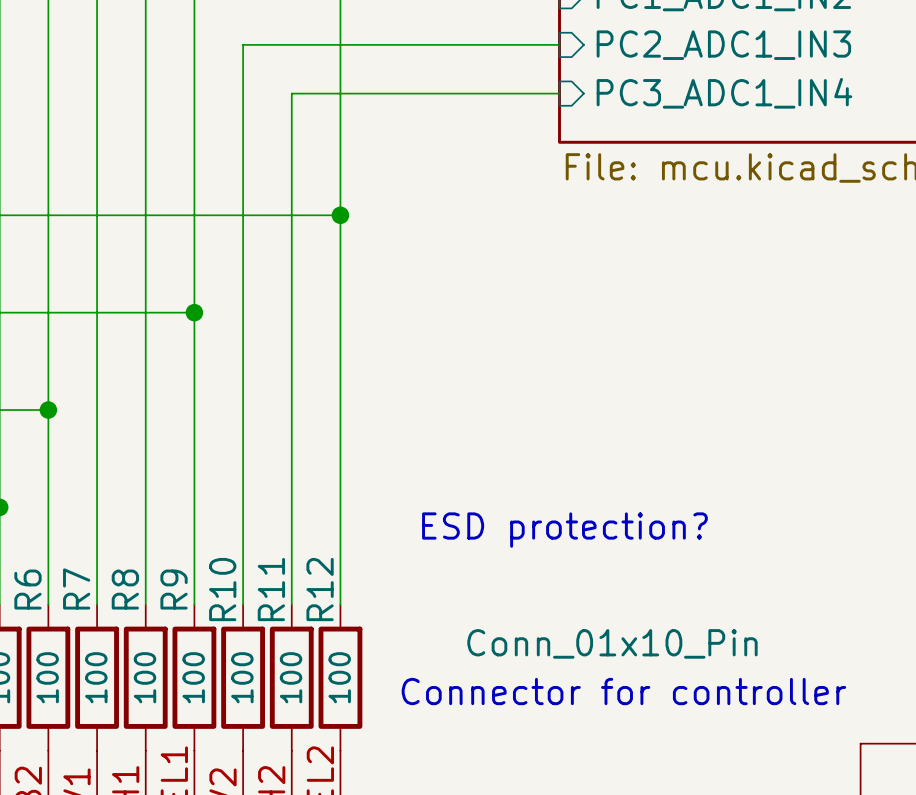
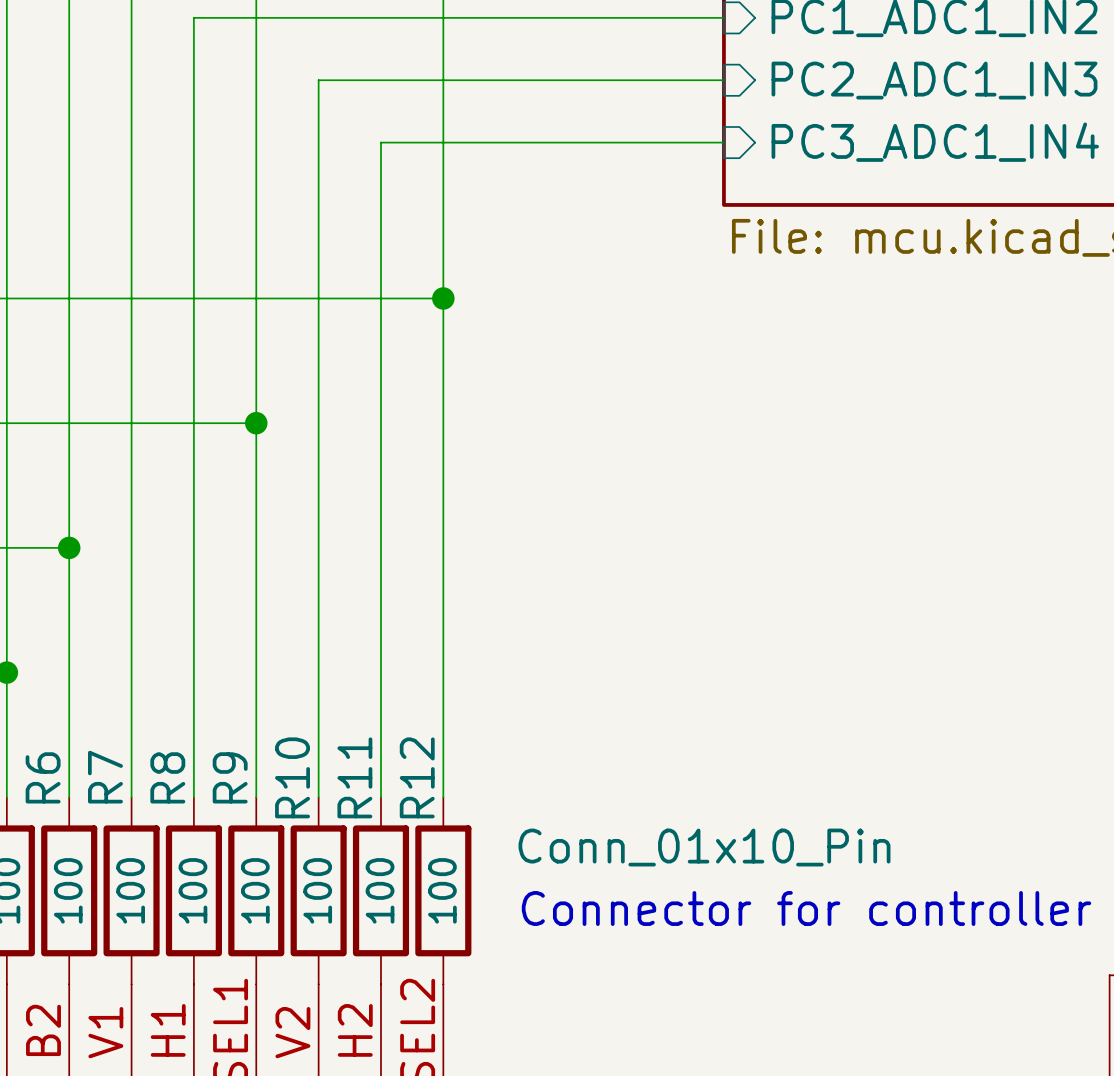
text: ESD protection? (564, 530) -> none
part value position: Conn_01x10_Pin (612, 643) -> Conn_01x10_Pin (704, 847)

